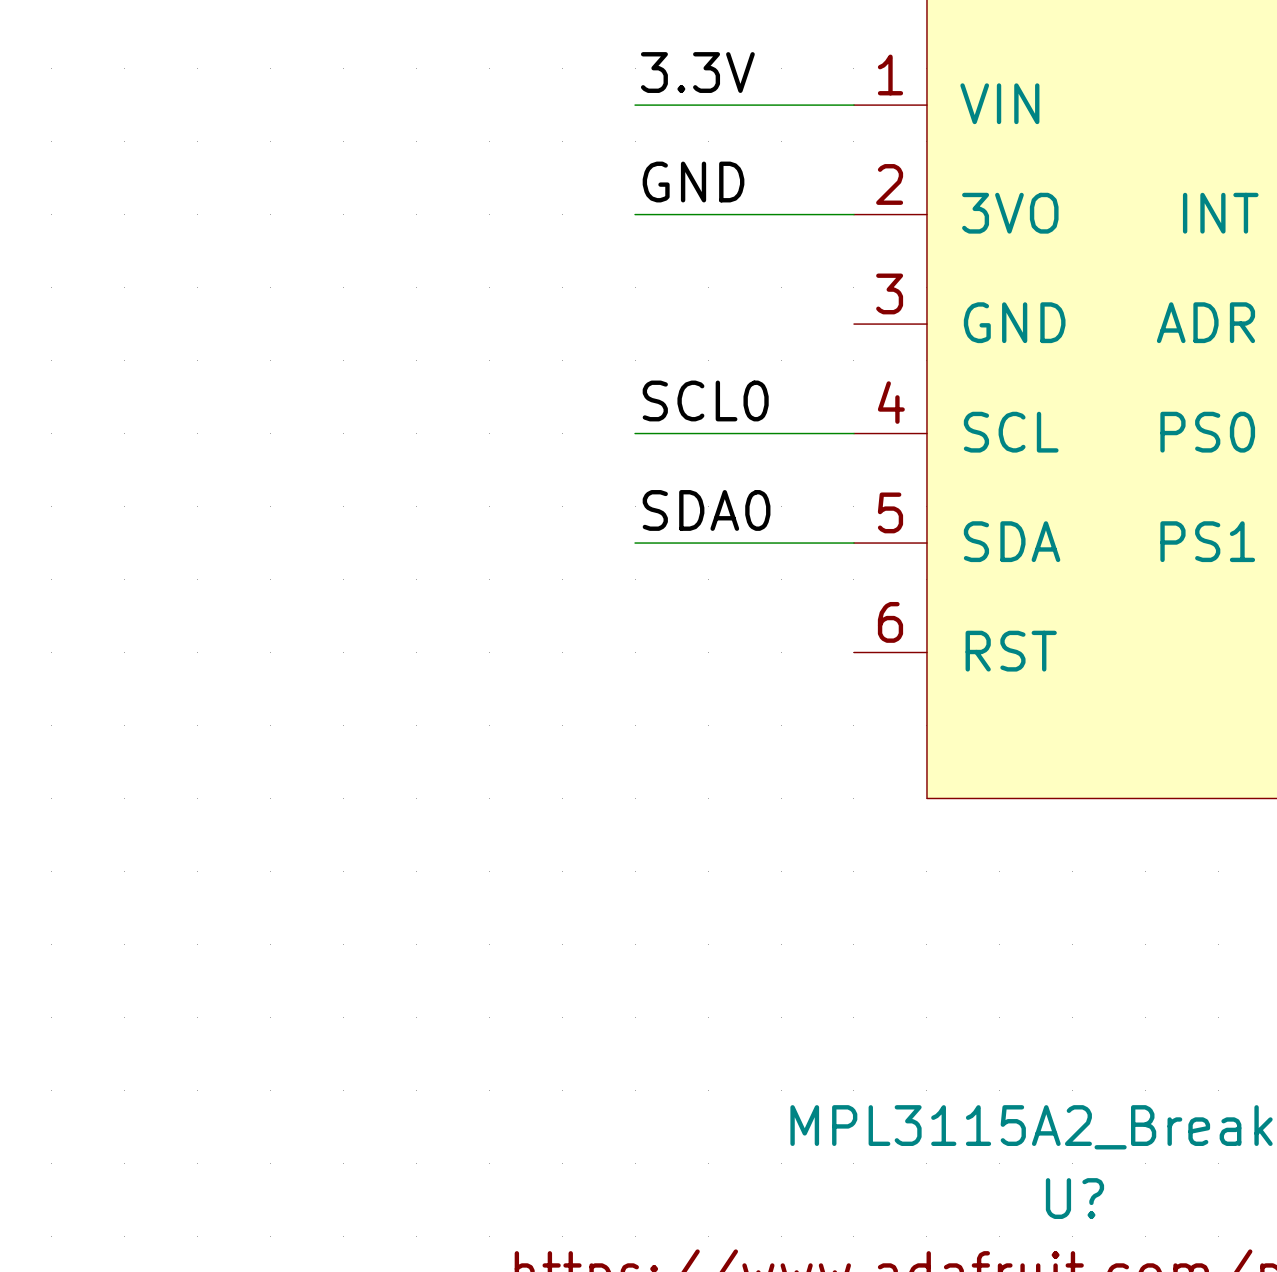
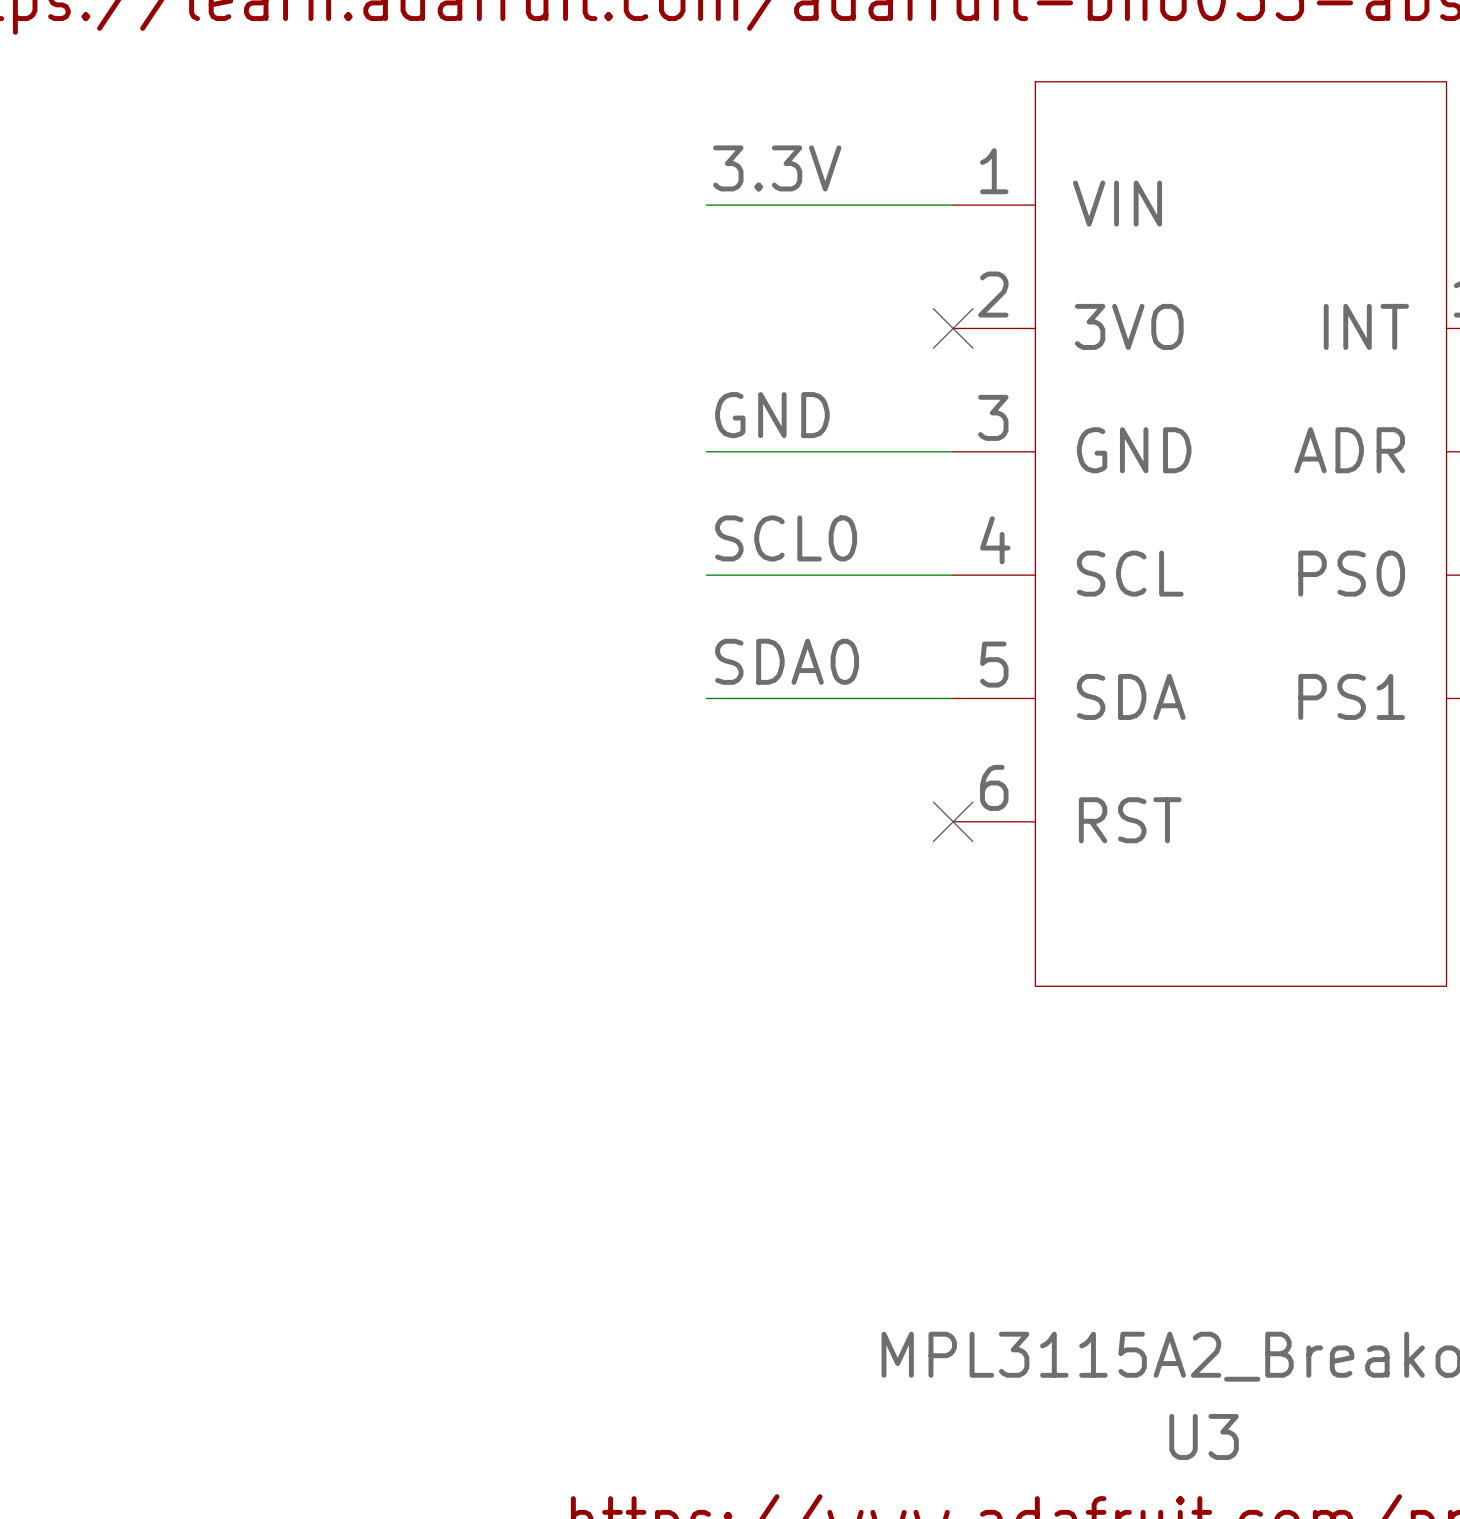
label position: GND (693, 182) -> GND (772, 415)
wire: (635, 214) (853, 214) -> (706, 451) (953, 451)
no-connect mark: none -> (953, 328)
no-connect mark: none -> (953, 821)
U? name: U? (1074, 1198) -> U3 (1204, 1436)

